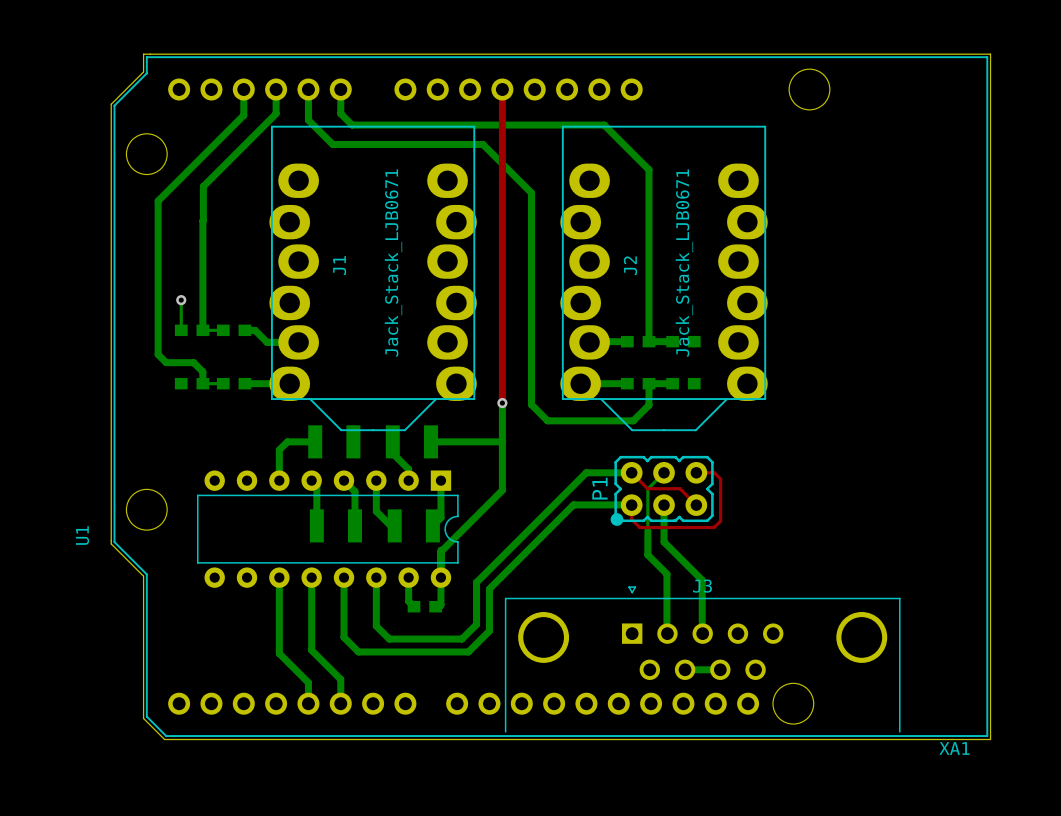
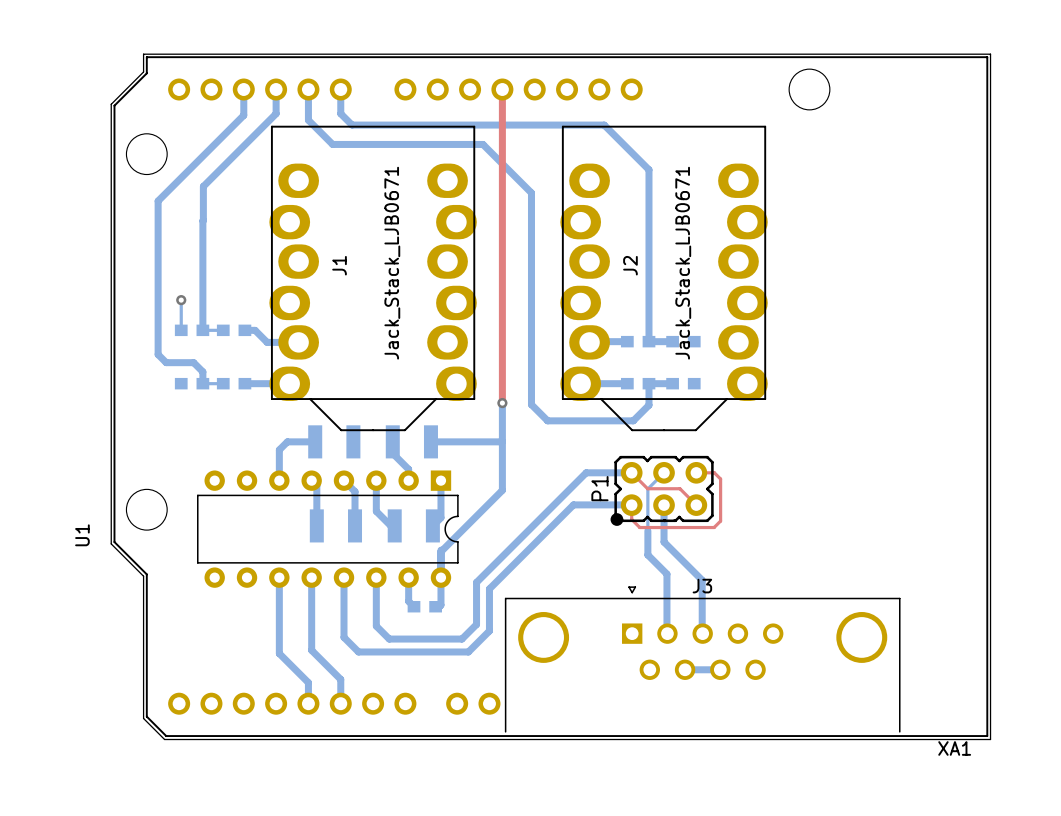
XA1 footprint: [113, 56, 989, 737] -> [113, 56, 989, 737]

